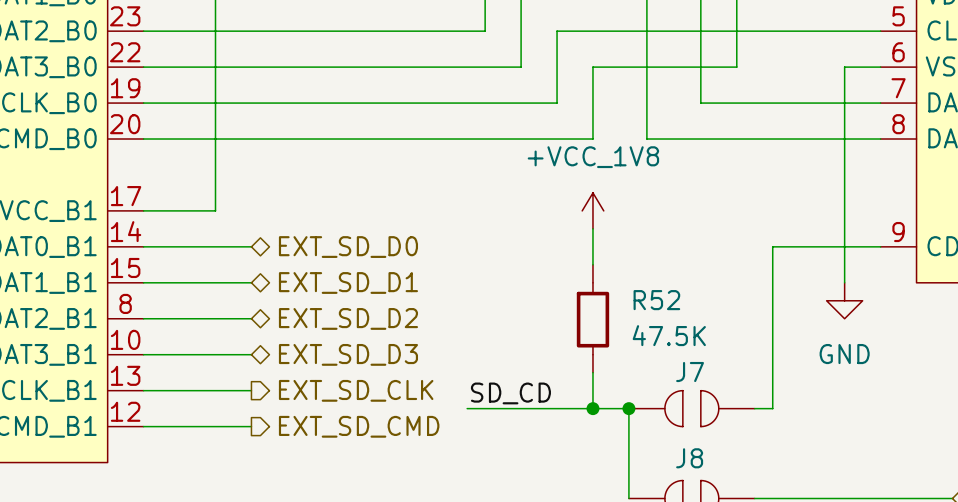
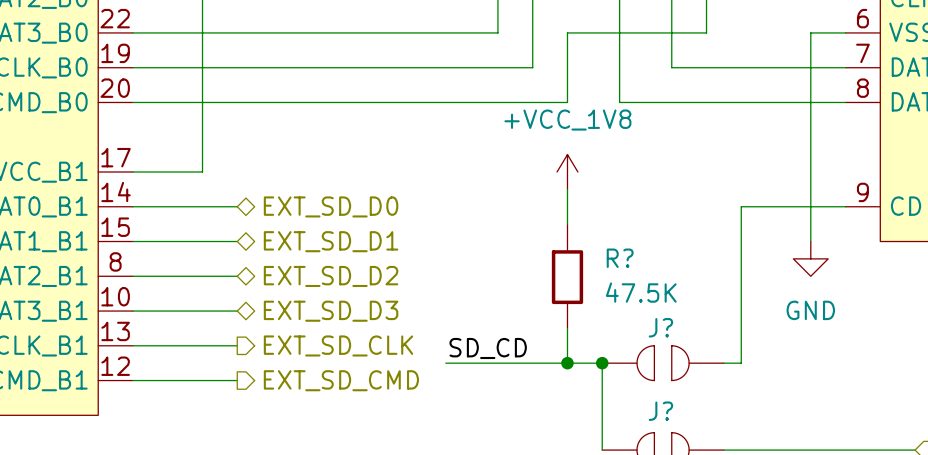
R52 name: R52 (656, 300) -> R? (620, 258)
J7 name: J7 (690, 372) -> J? (660, 327)
J8 name: J8 (689, 458) -> J? (660, 411)

